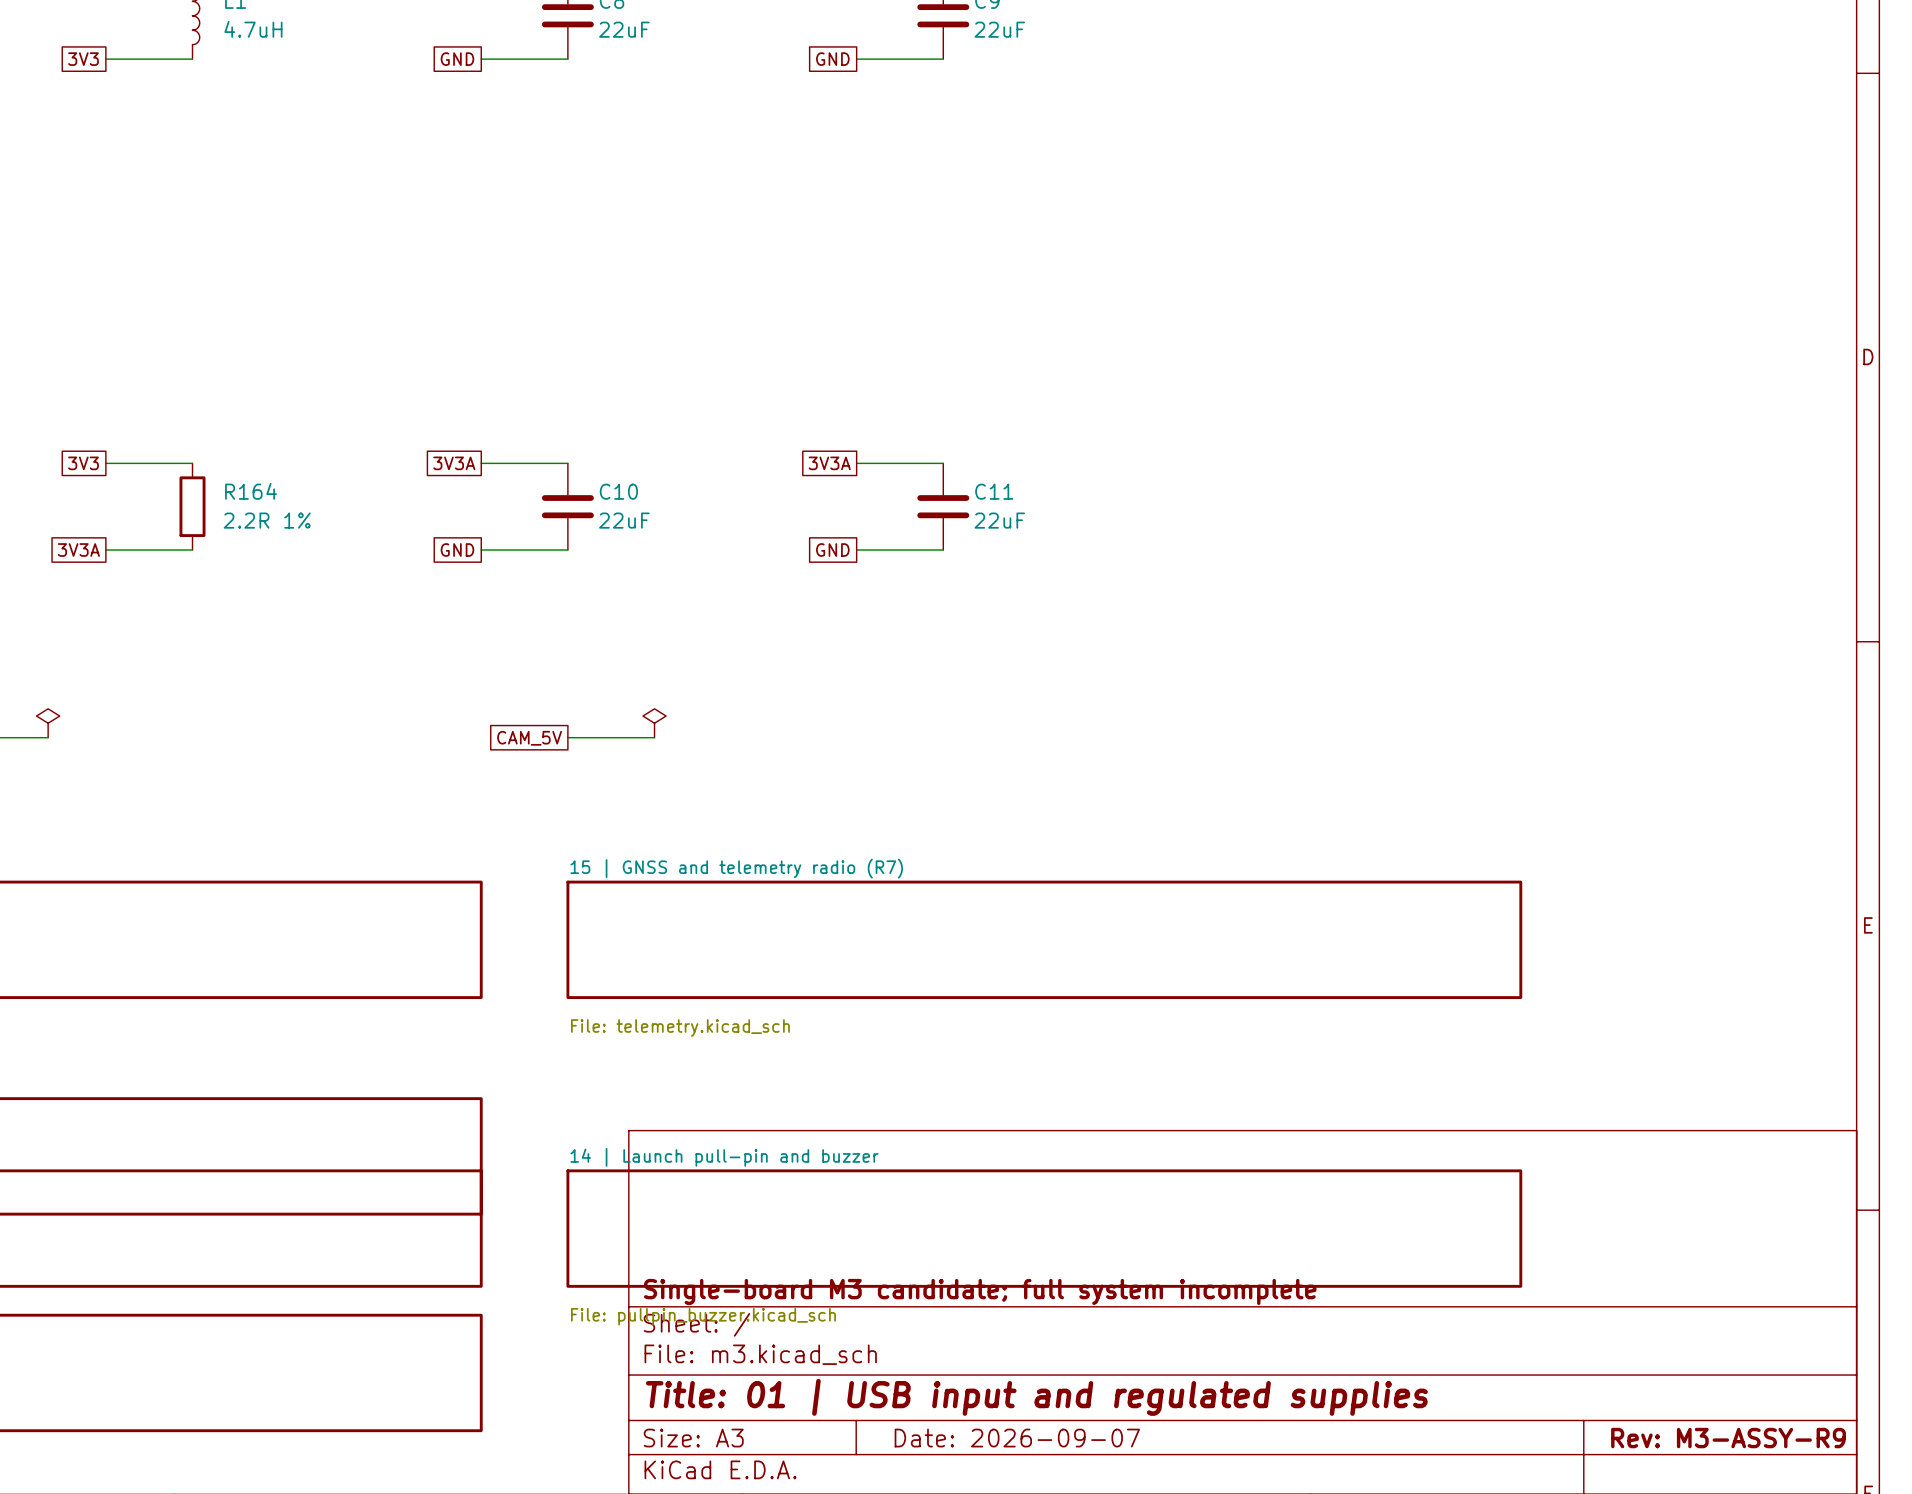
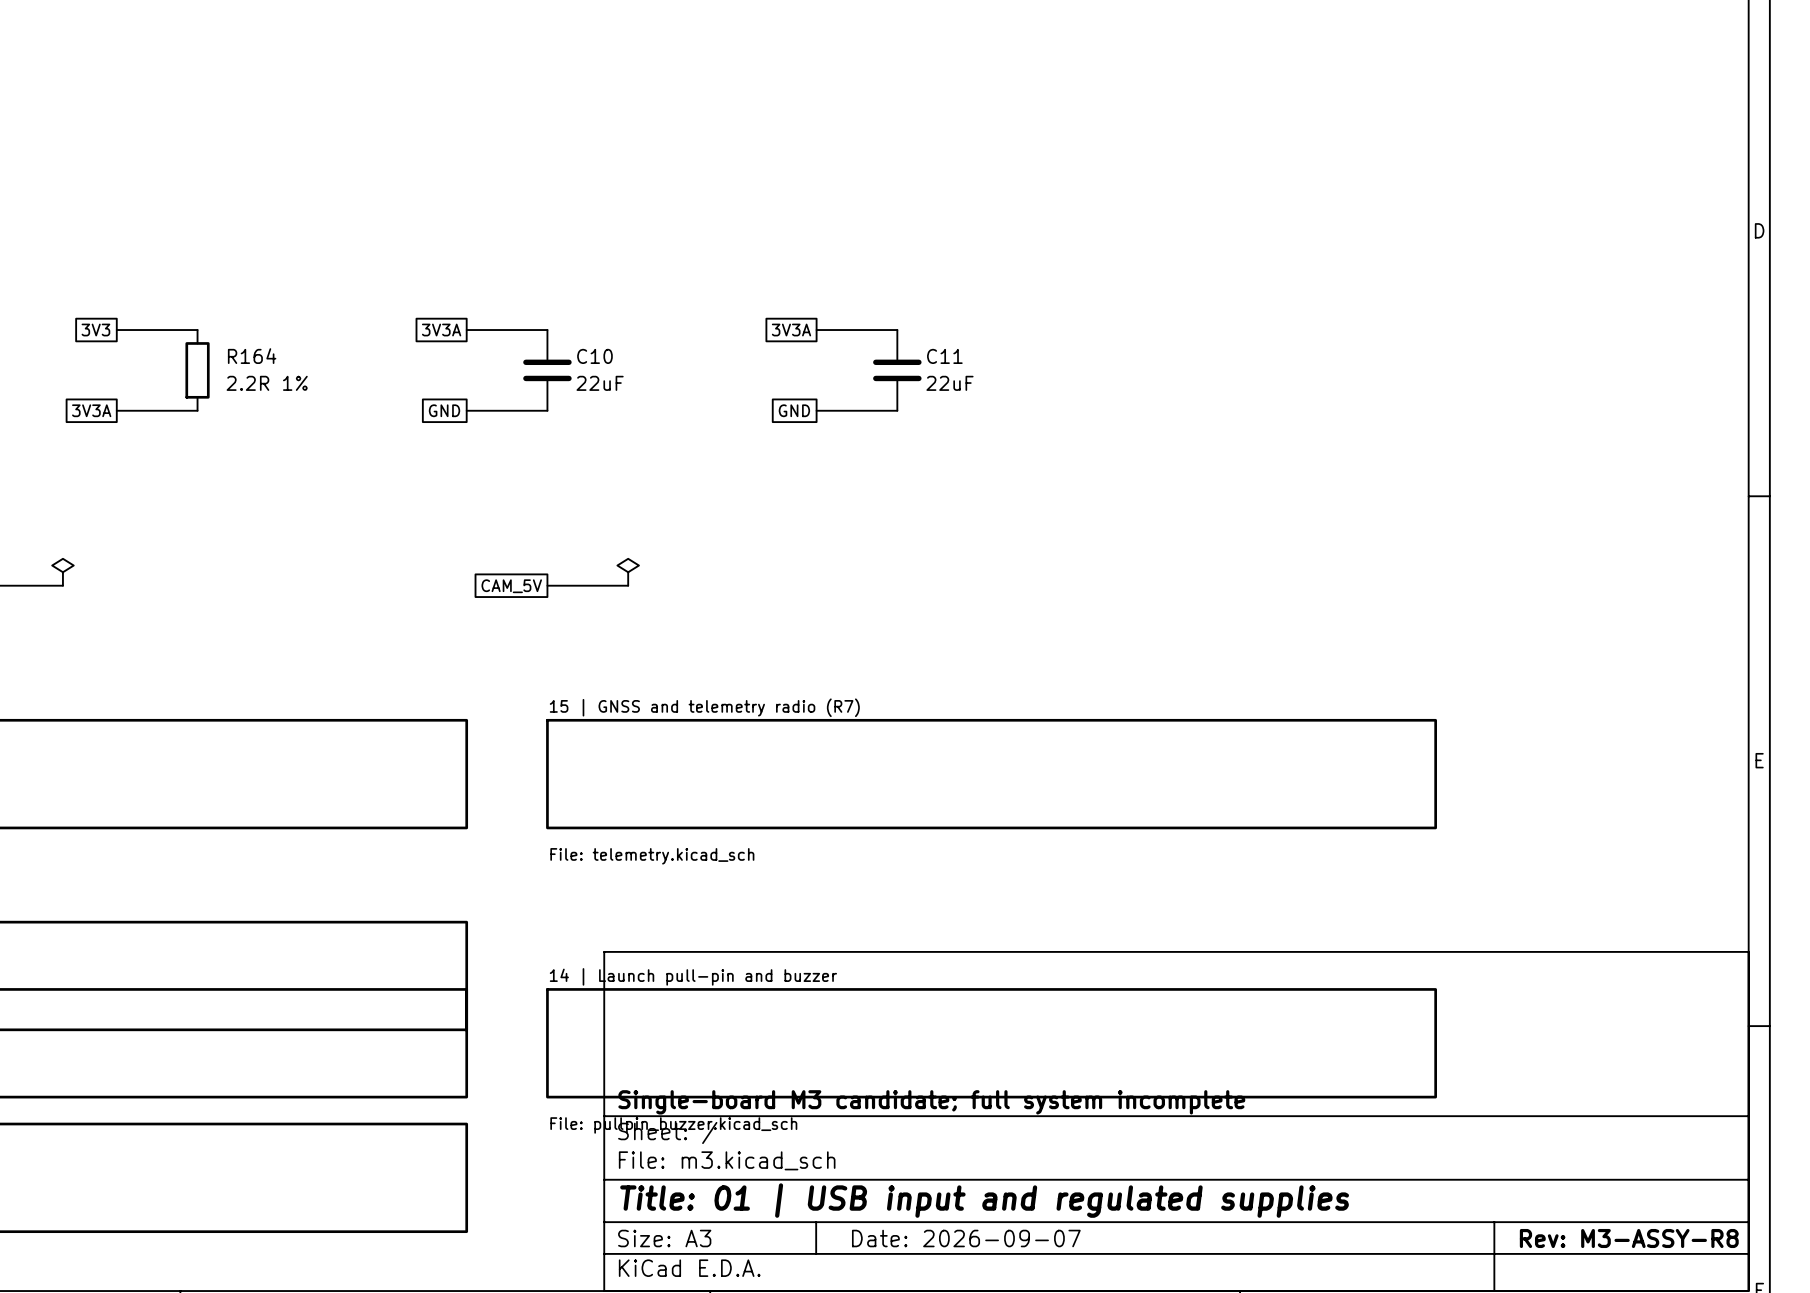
title block: Rev: M3-ASSY-R9 (1728, 1438) -> Rev: M3-ASSY-R8 (1629, 1238)

